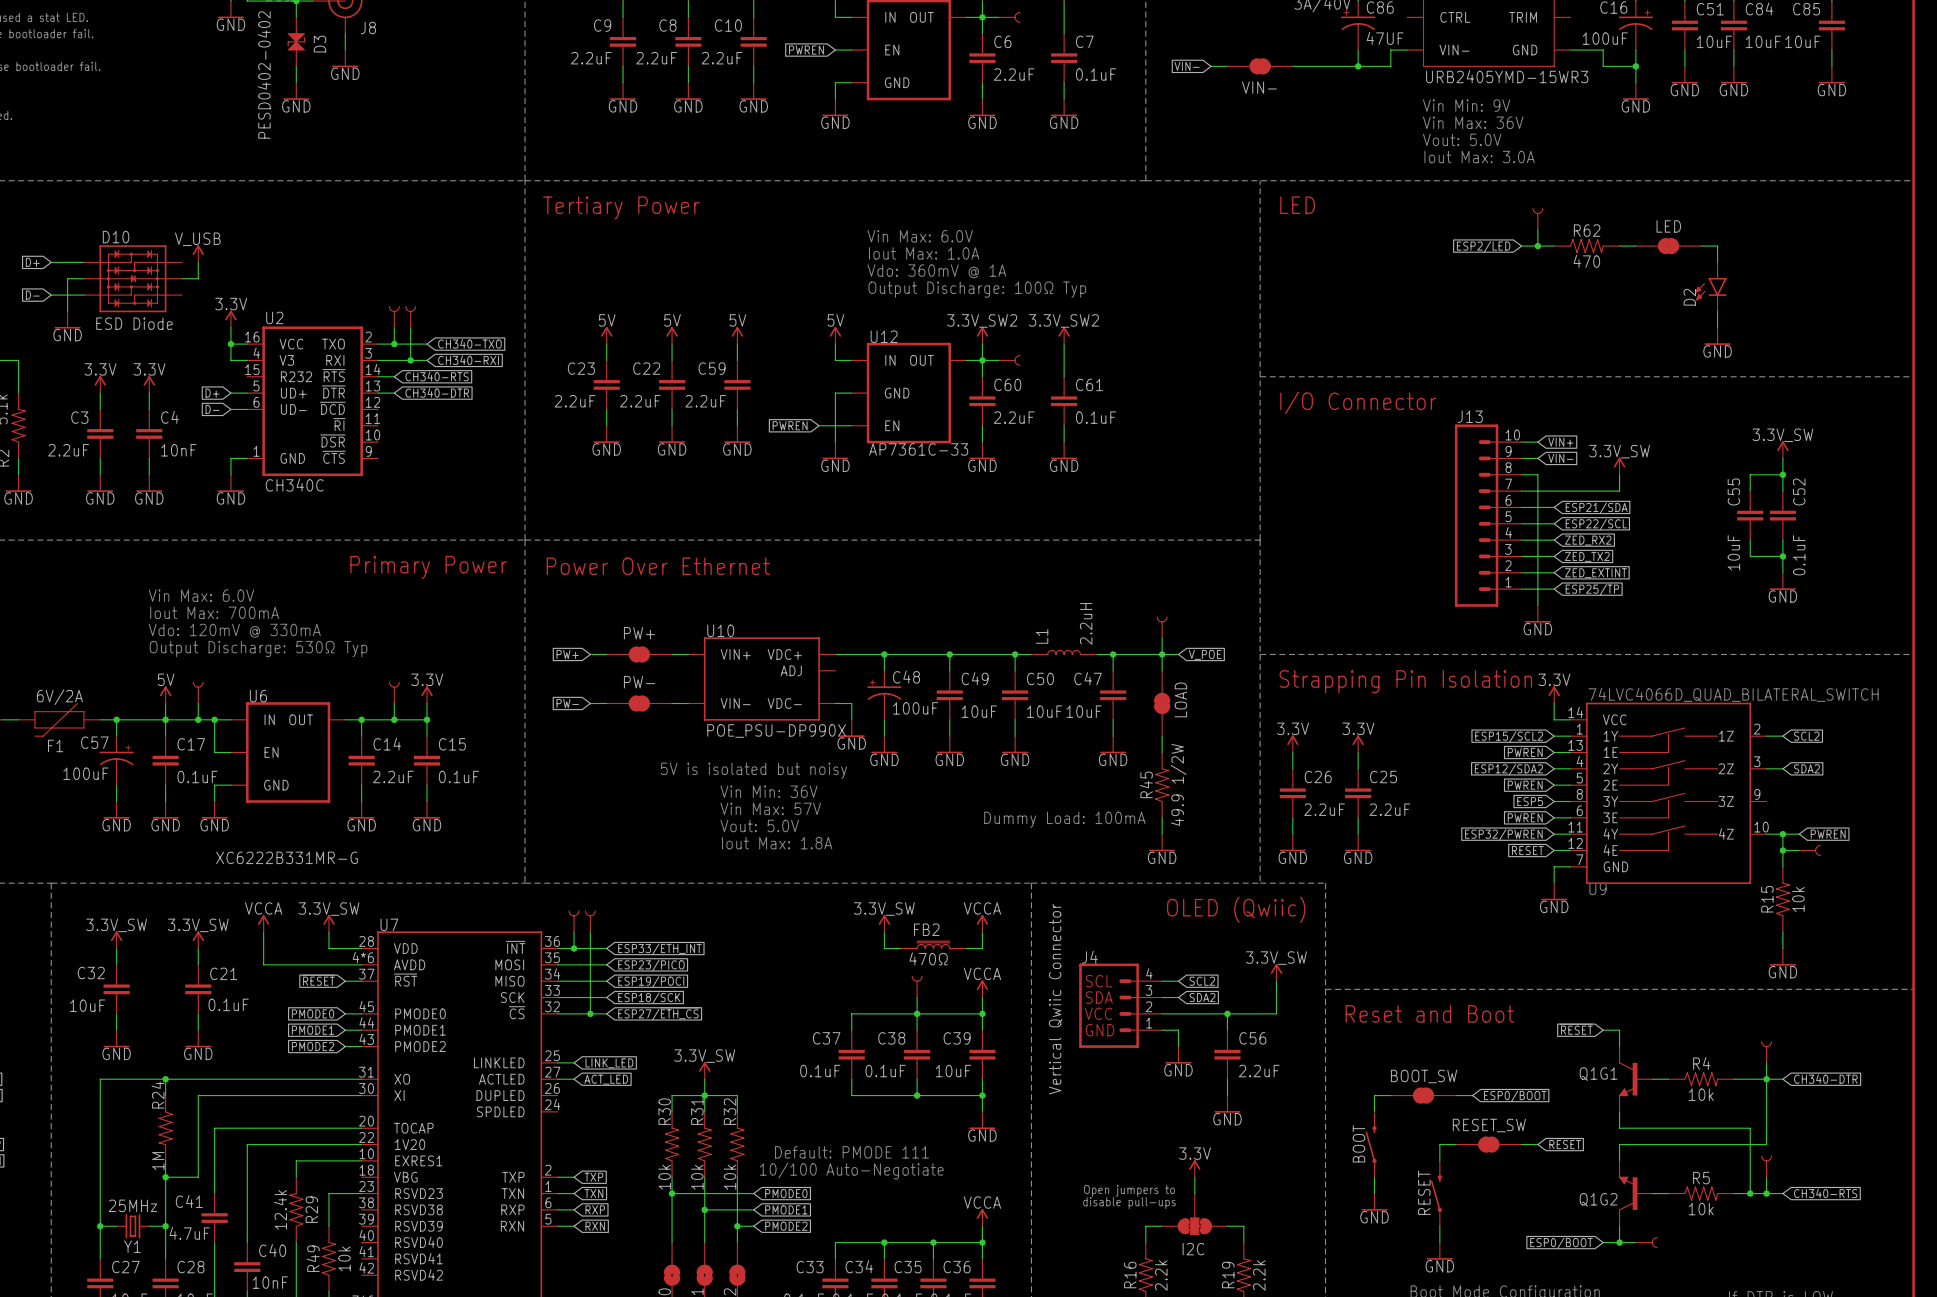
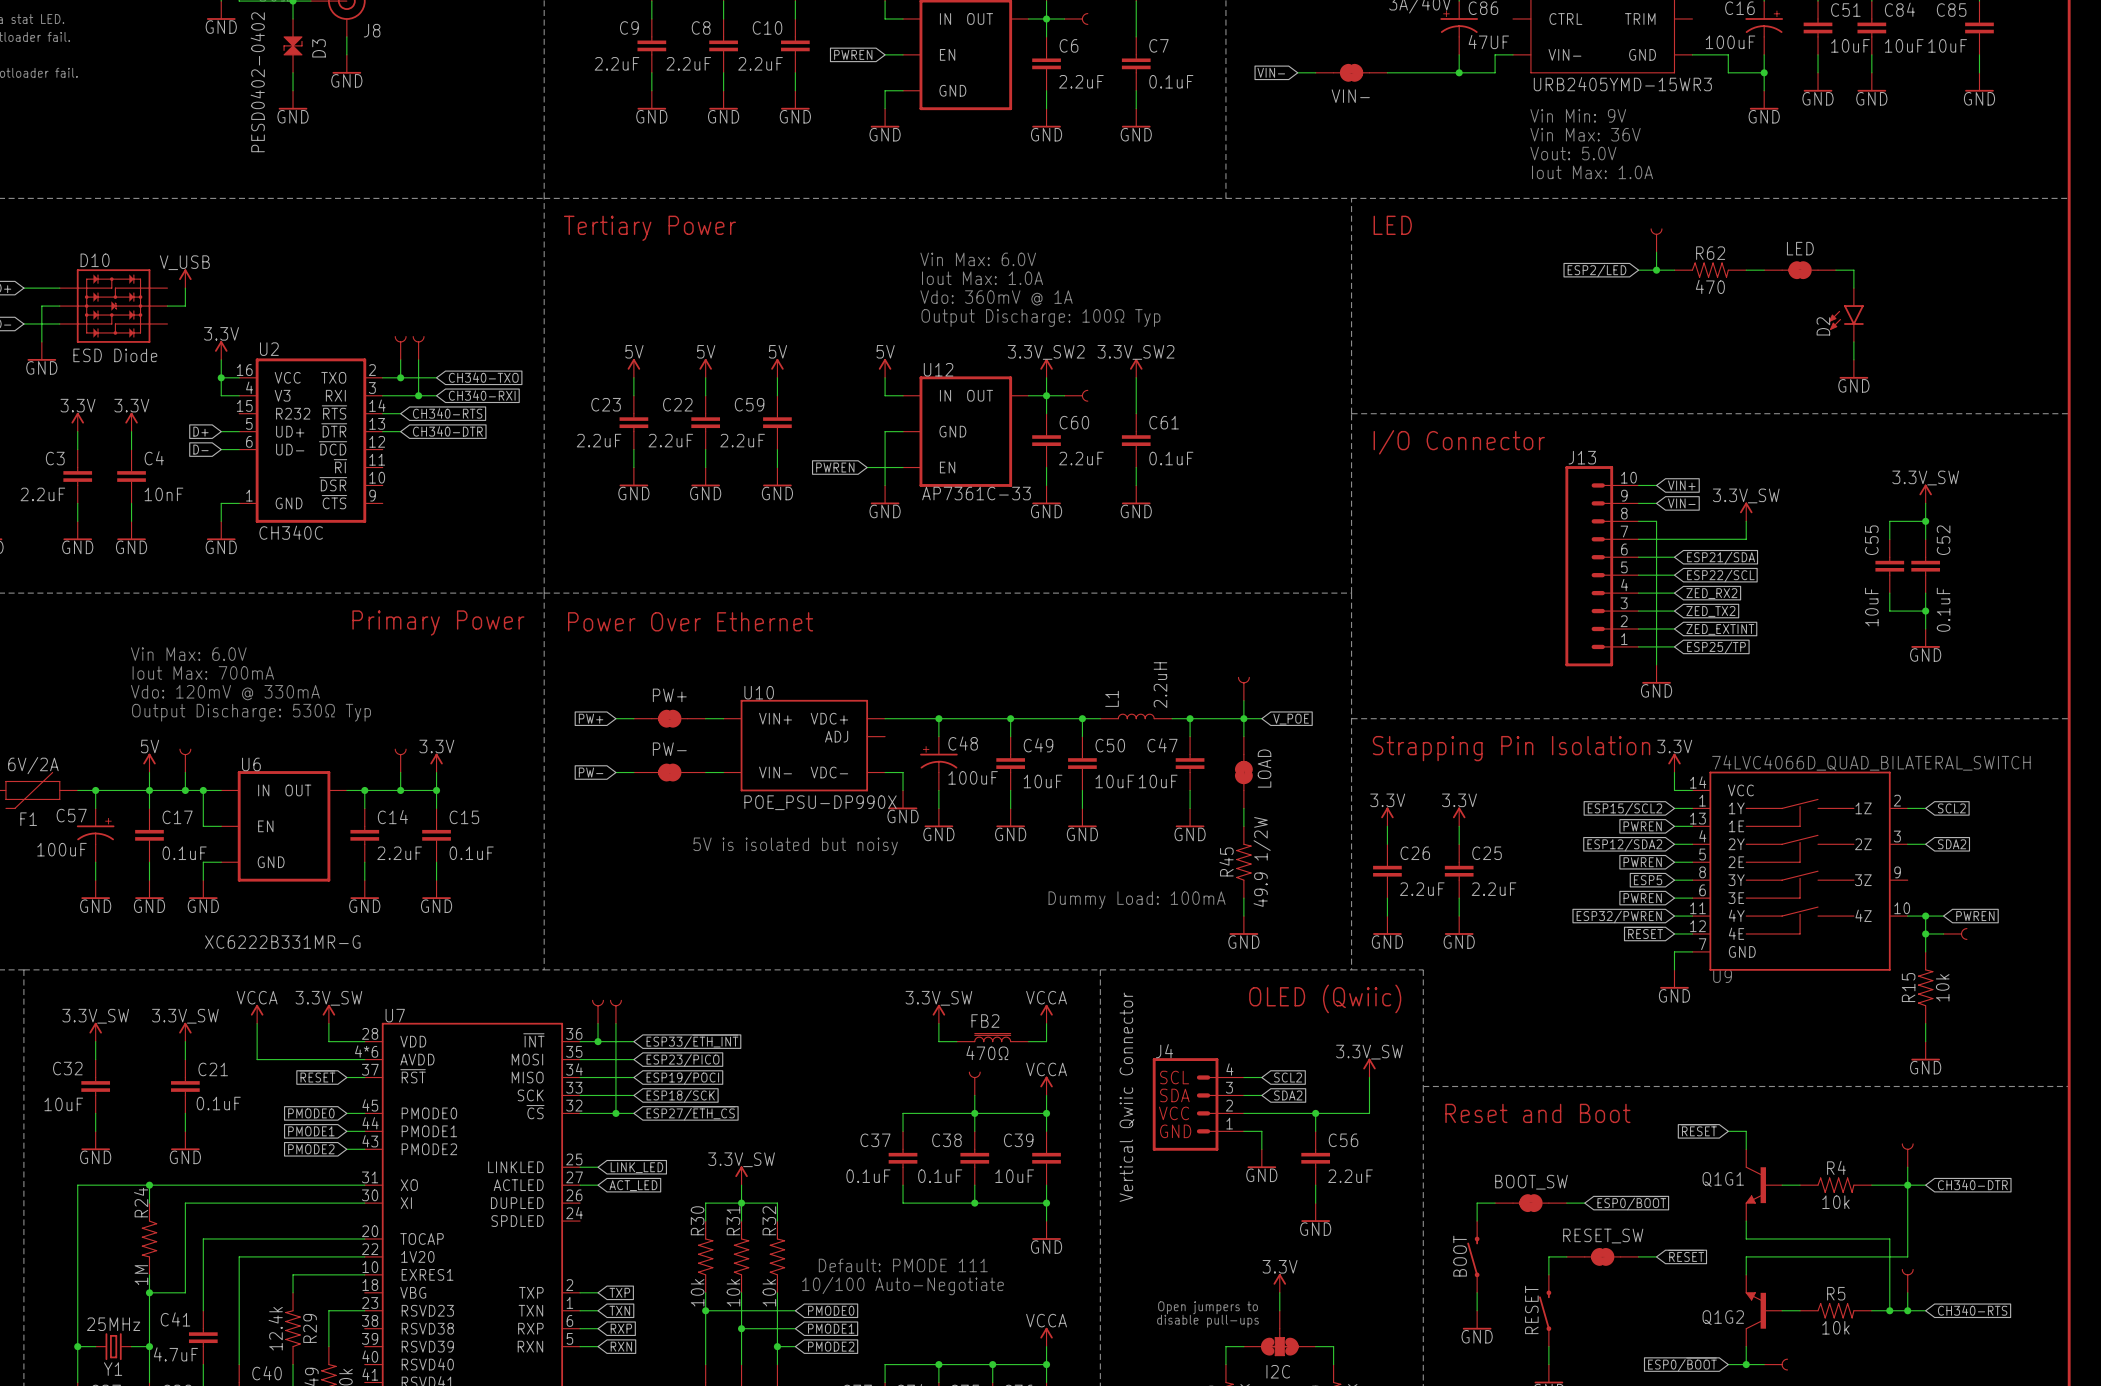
text: Iout Max: 3.0A (1479, 157) -> Iout Max: 1.0A (1592, 172)
text: Vin Min: 36V (769, 791) -> none
text: Vin Max: 57V (770, 808) -> none
text: Vout: 5.0V (759, 826) -> none
text: Iout Max: 1.8A (777, 843) -> none

